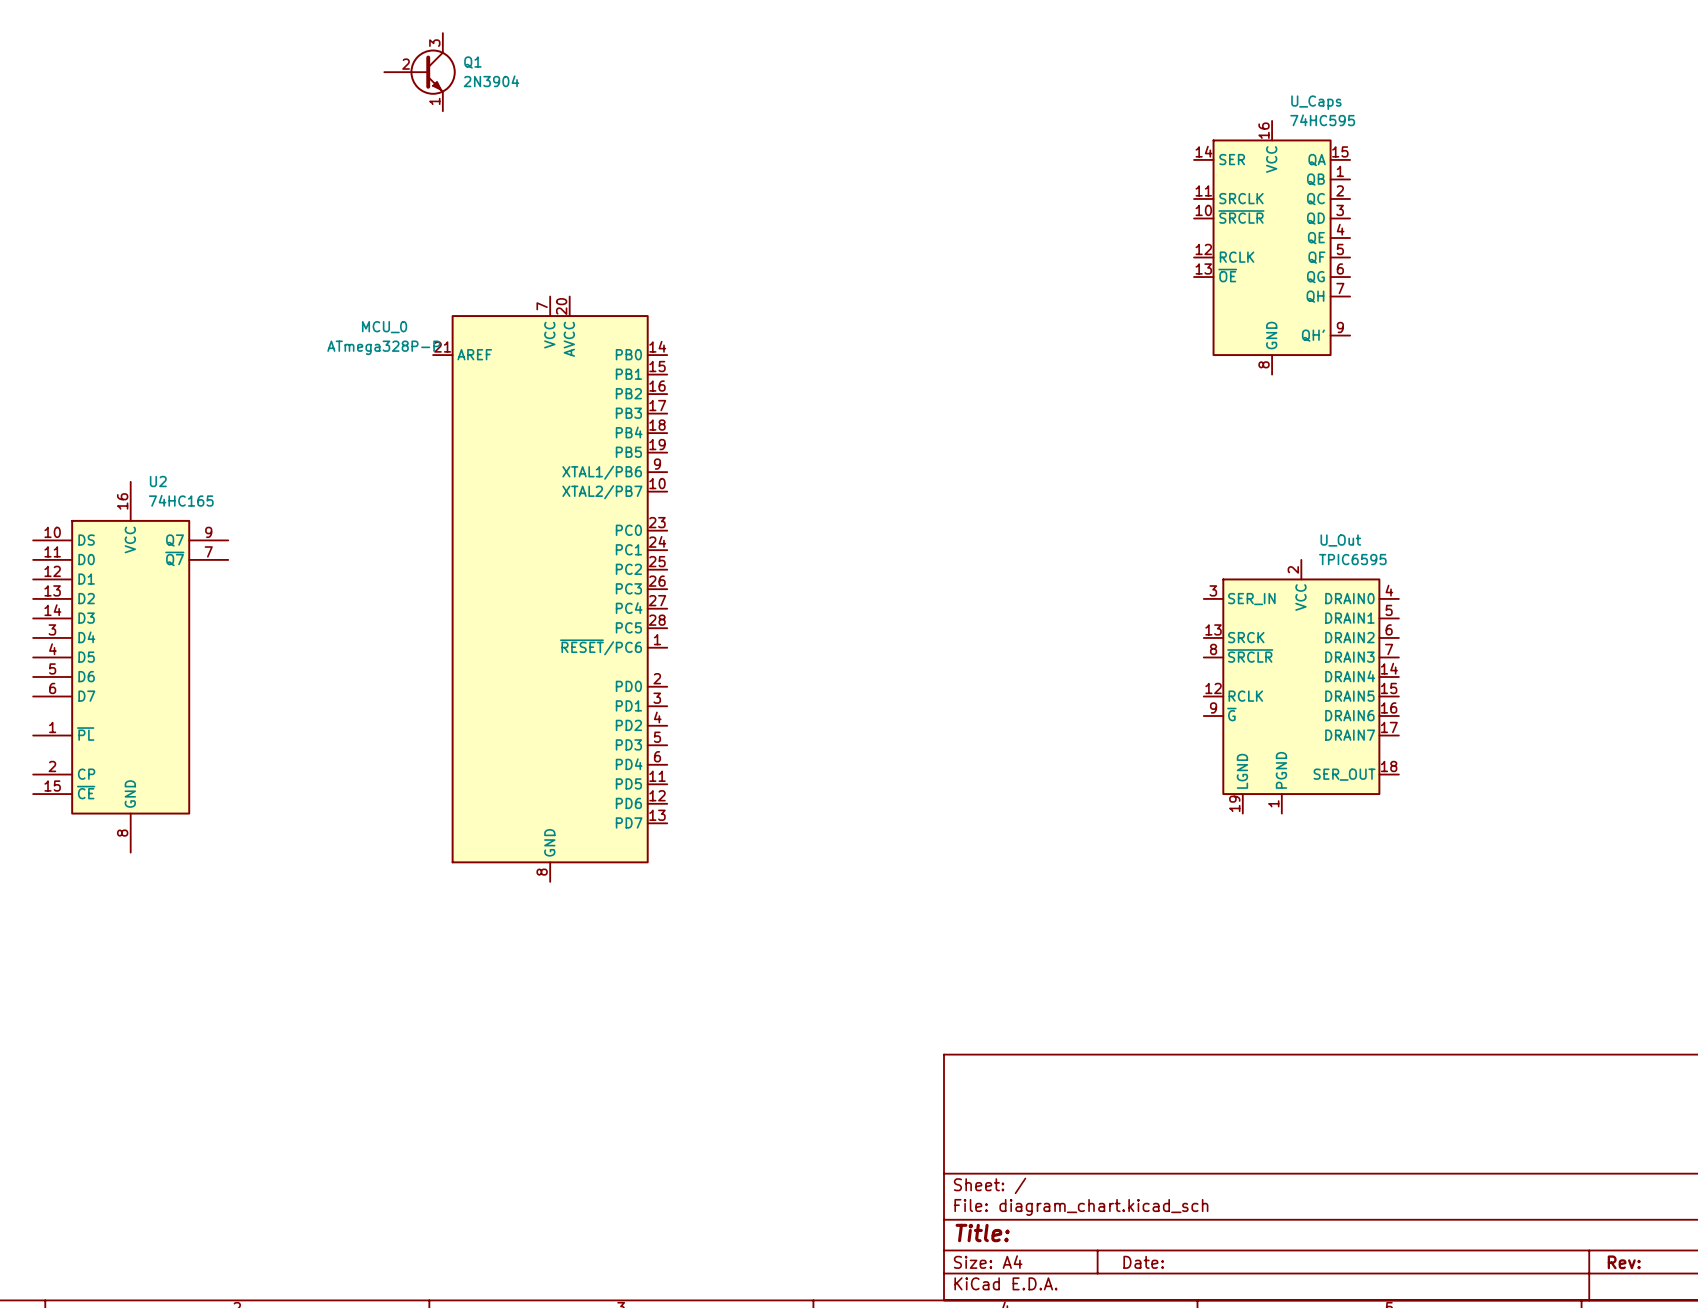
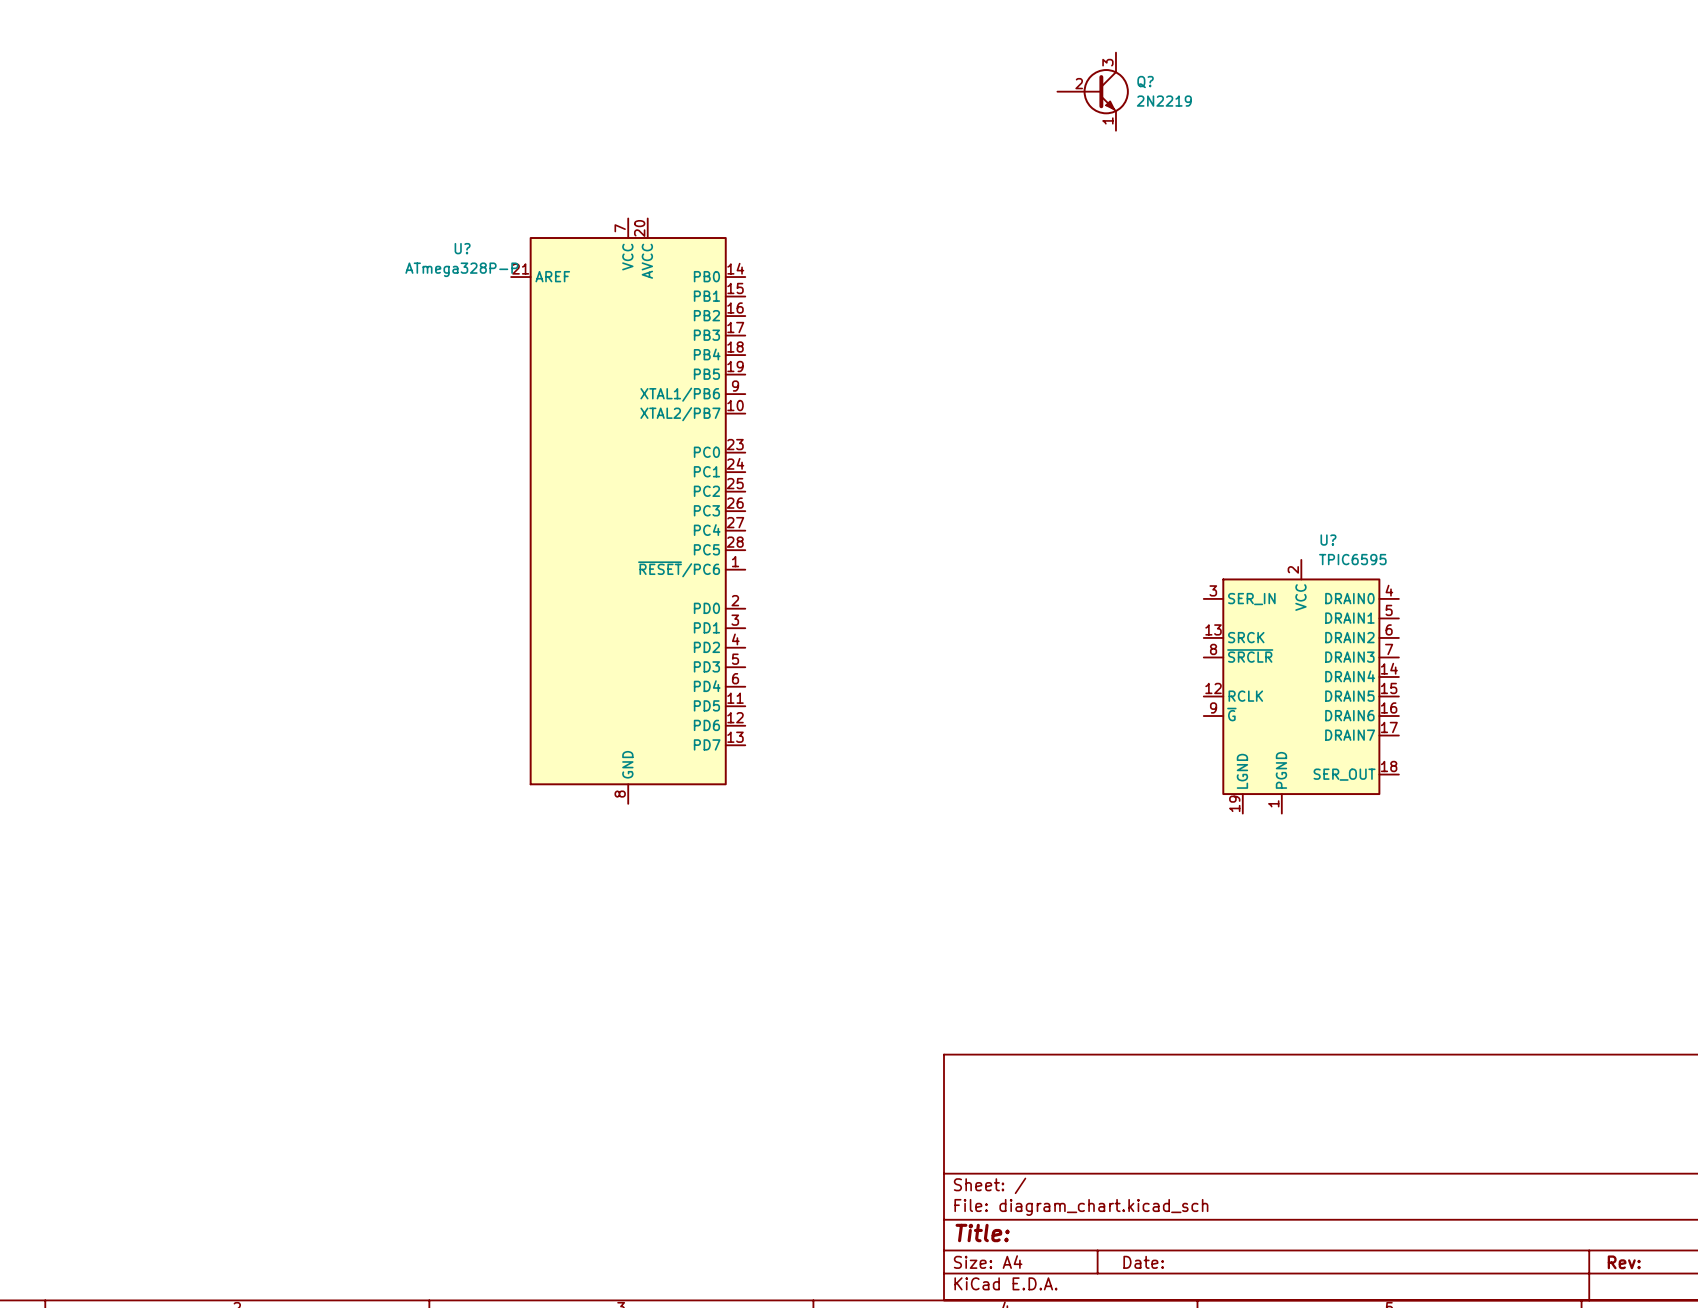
Q1: 2N3904 (420, 72) -> none
Q?: none -> 2N2219 (1093, 91)
U_Caps: 74HC595 (1272, 247) -> none
U?: none -> ATmega328P-P (628, 511)
U_Out name: U_Out (1340, 540) -> U? (1328, 540)
MCU_0: ATmega328P-P (550, 589) -> none
U2: 74HC165 (130, 667) -> none

